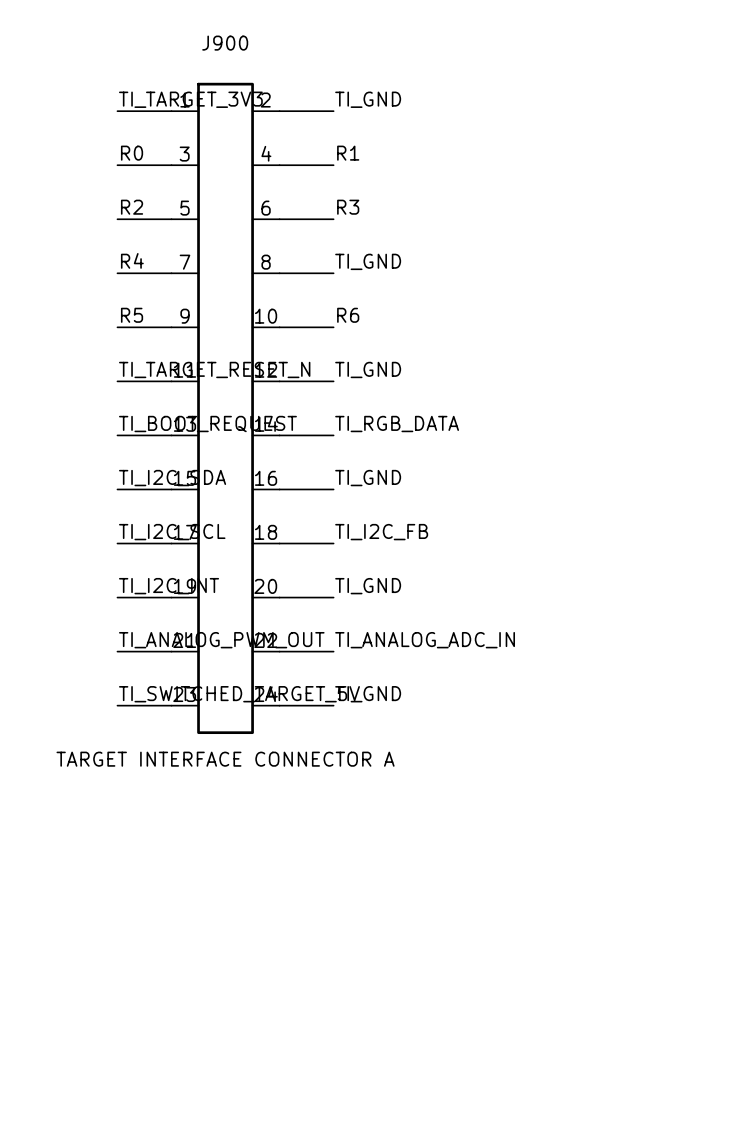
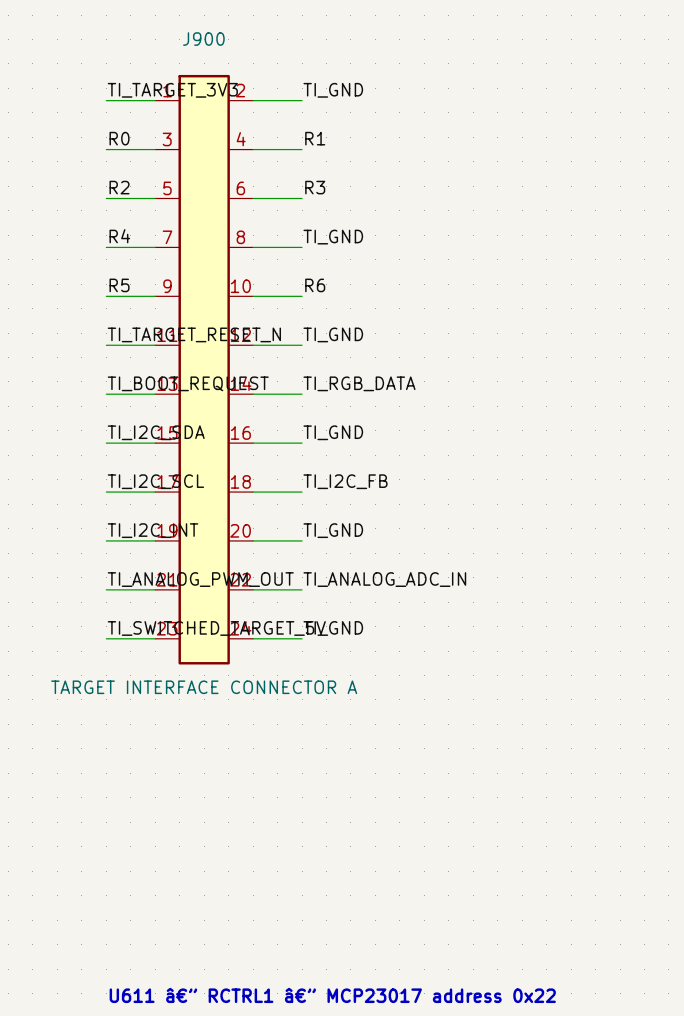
text: none -> U611 â€” RCTRL1 â€” MCP23017 address 0x22 (332, 995)

